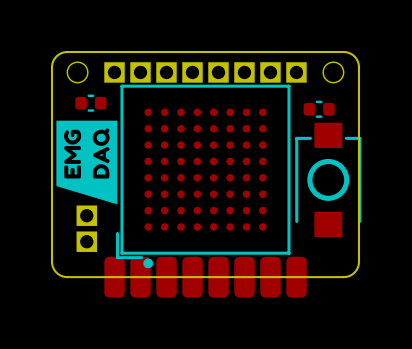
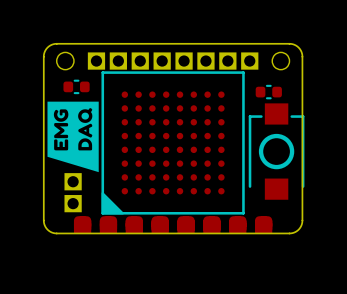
part footprint: [115, 84, 291, 269] -> [101, 71, 245, 215]
part footprint: [182, 256, 203, 298] -> [151, 216, 169, 234]
part footprint: [208, 256, 229, 298] -> [177, 216, 195, 234]
part: none -> (82, 224)
part: none -> (108, 224)
part: none -> (134, 224)
part: none -> (211, 224)
part: none -> (237, 224)
part: none -> (263, 224)
part: (114, 277) -> none
part: (140, 277) -> none
part: (166, 277) -> none
part: (244, 277) -> none
part: (270, 277) -> none
part: (296, 277) -> none

